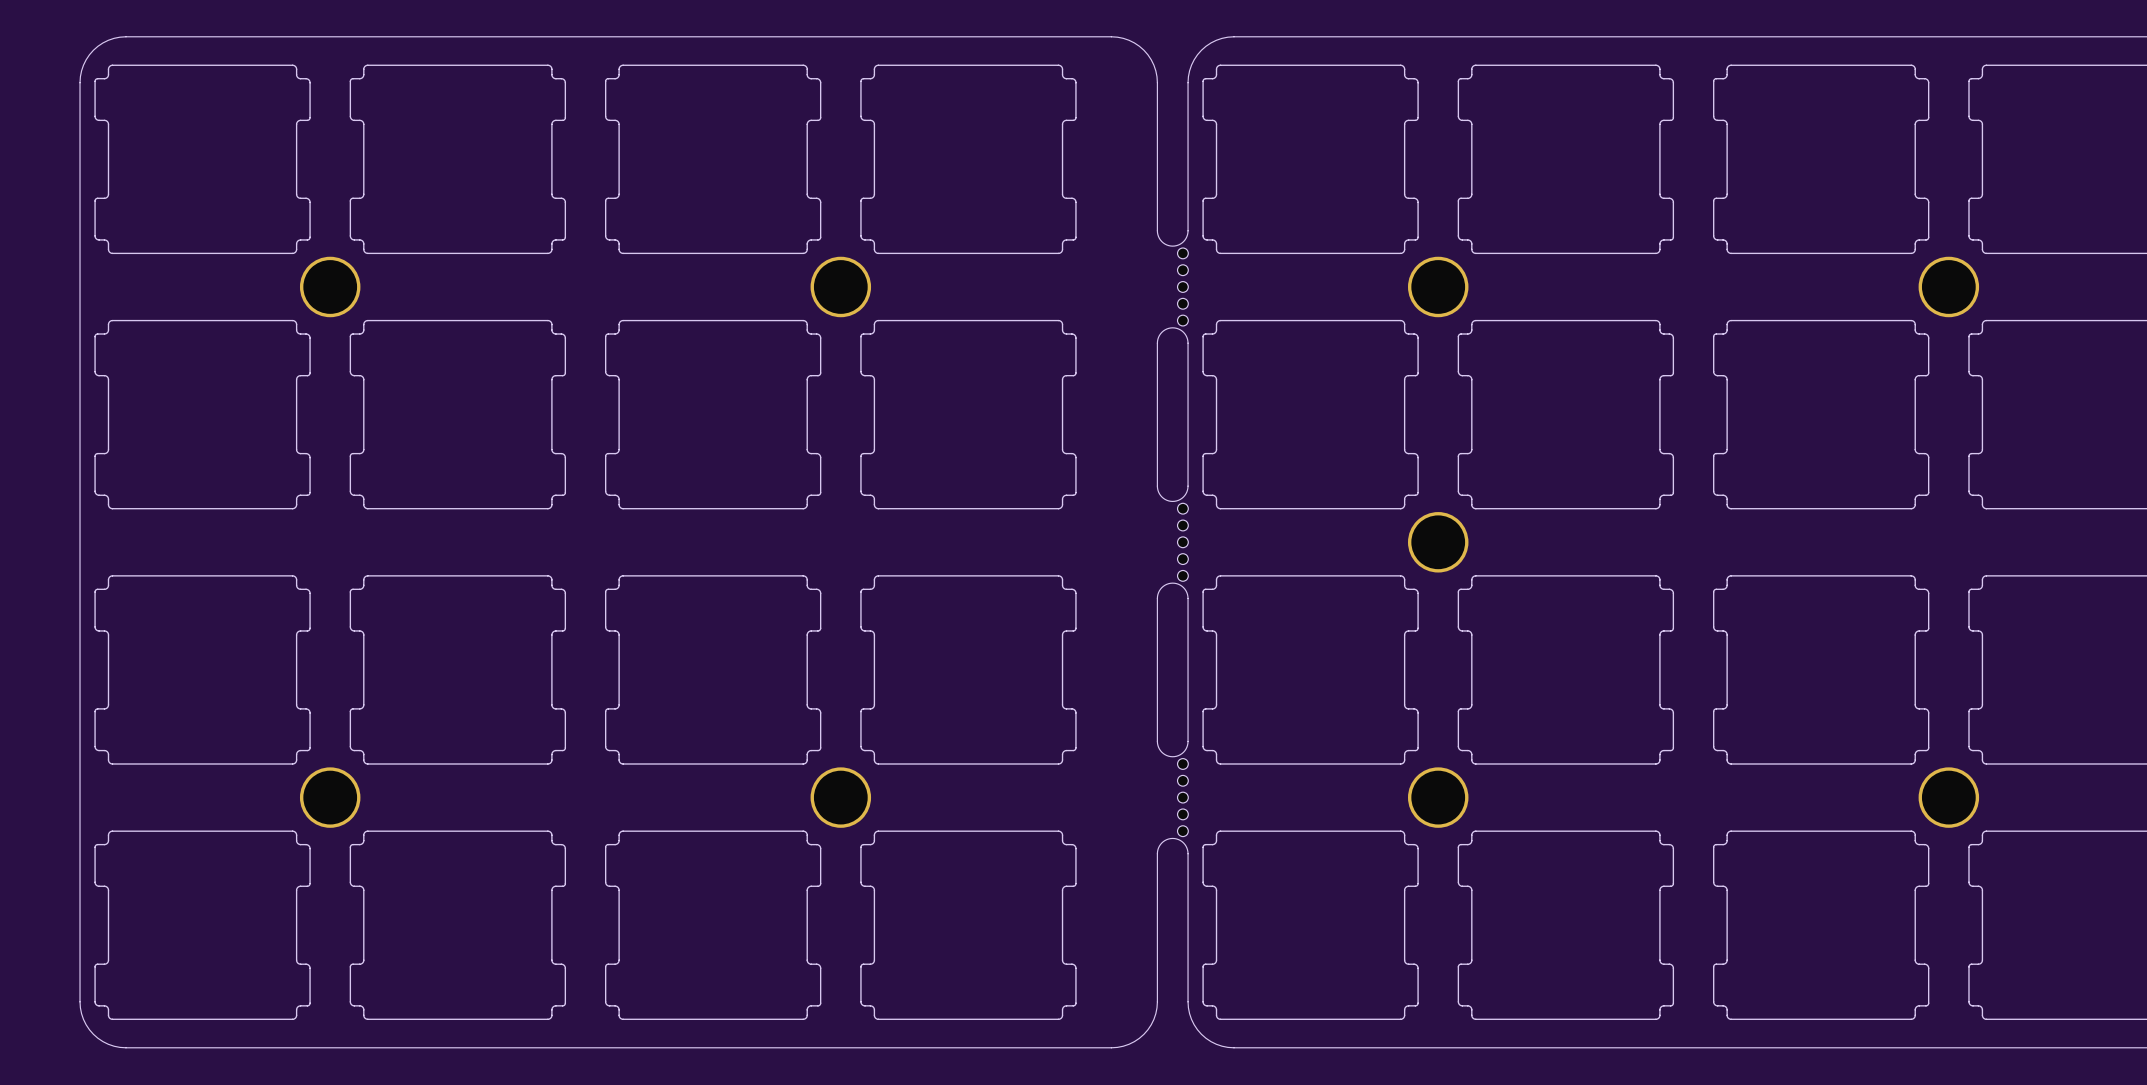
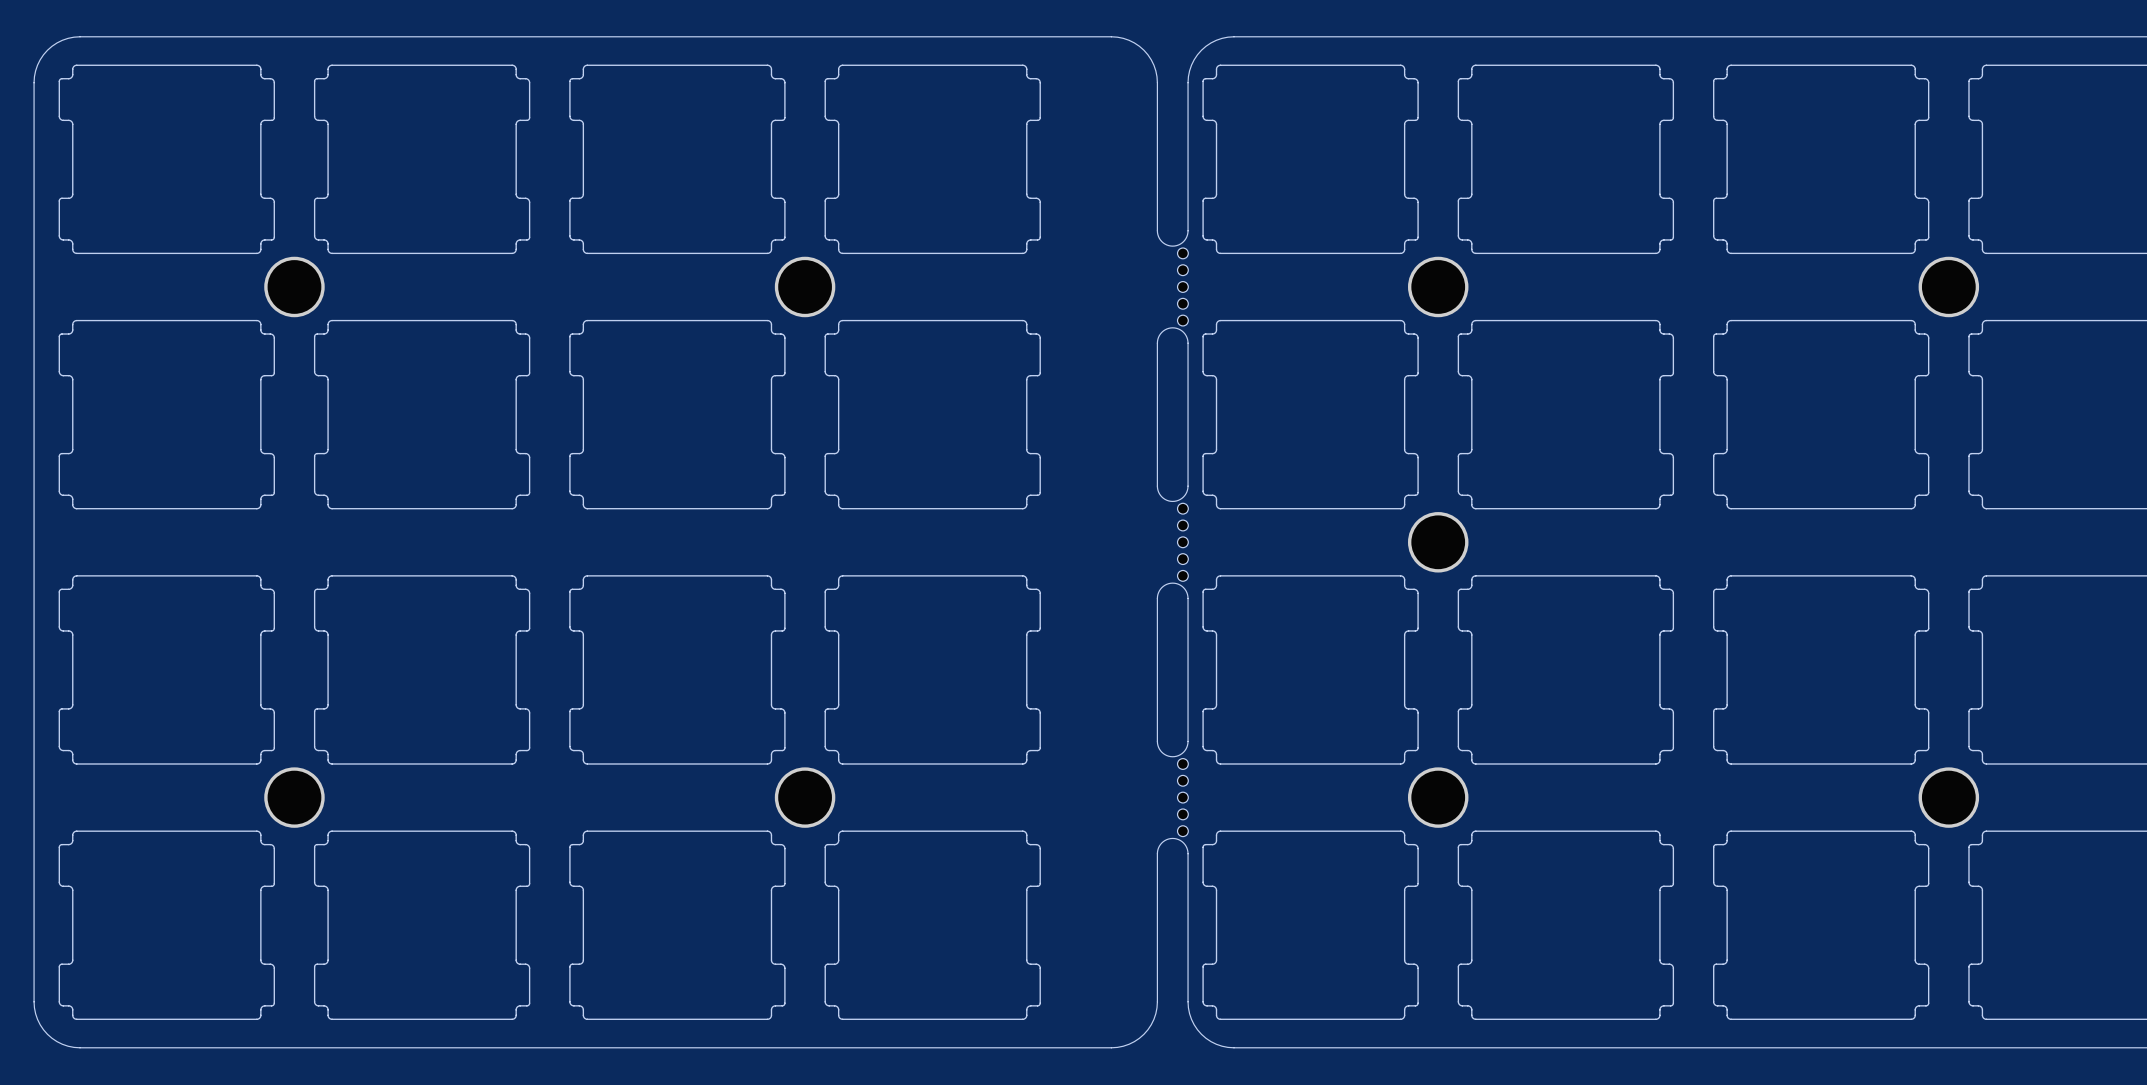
board edge: (125, 36) (108, 40) (93, 50) (83, 65) (80, 82) (80, 1001) (83, 1019) (93, 1034) (108, 1044) (125, 1047) -> (125, 36) (80, 36) (62, 40) (52, 46) (43, 54) (37, 65) (34, 76) (34, 1001) (35, 1013) (40, 1024) (47, 1034) (57, 1041) (74, 1047) (125, 1047)
drawing position: (202, 159) -> (166, 159)
drawing position: (457, 159) -> (422, 159)
drawing position: (713, 159) -> (677, 159)
drawing position: (968, 159) -> (932, 159)
part position: (330, 286) -> (294, 286)
part position: (840, 286) -> (805, 286)
drawing position: (202, 414) -> (166, 414)
drawing position: (457, 414) -> (422, 414)
drawing position: (713, 414) -> (677, 414)
drawing position: (968, 414) -> (932, 414)
drawing position: (202, 669) -> (166, 669)
drawing position: (457, 669) -> (422, 669)
drawing position: (713, 669) -> (677, 669)
drawing position: (968, 669) -> (932, 669)
part position: (330, 797) -> (294, 797)
part position: (840, 797) -> (805, 797)
drawing position: (202, 925) -> (166, 925)
drawing position: (457, 925) -> (422, 925)
drawing position: (713, 925) -> (677, 925)
drawing position: (968, 925) -> (932, 925)

